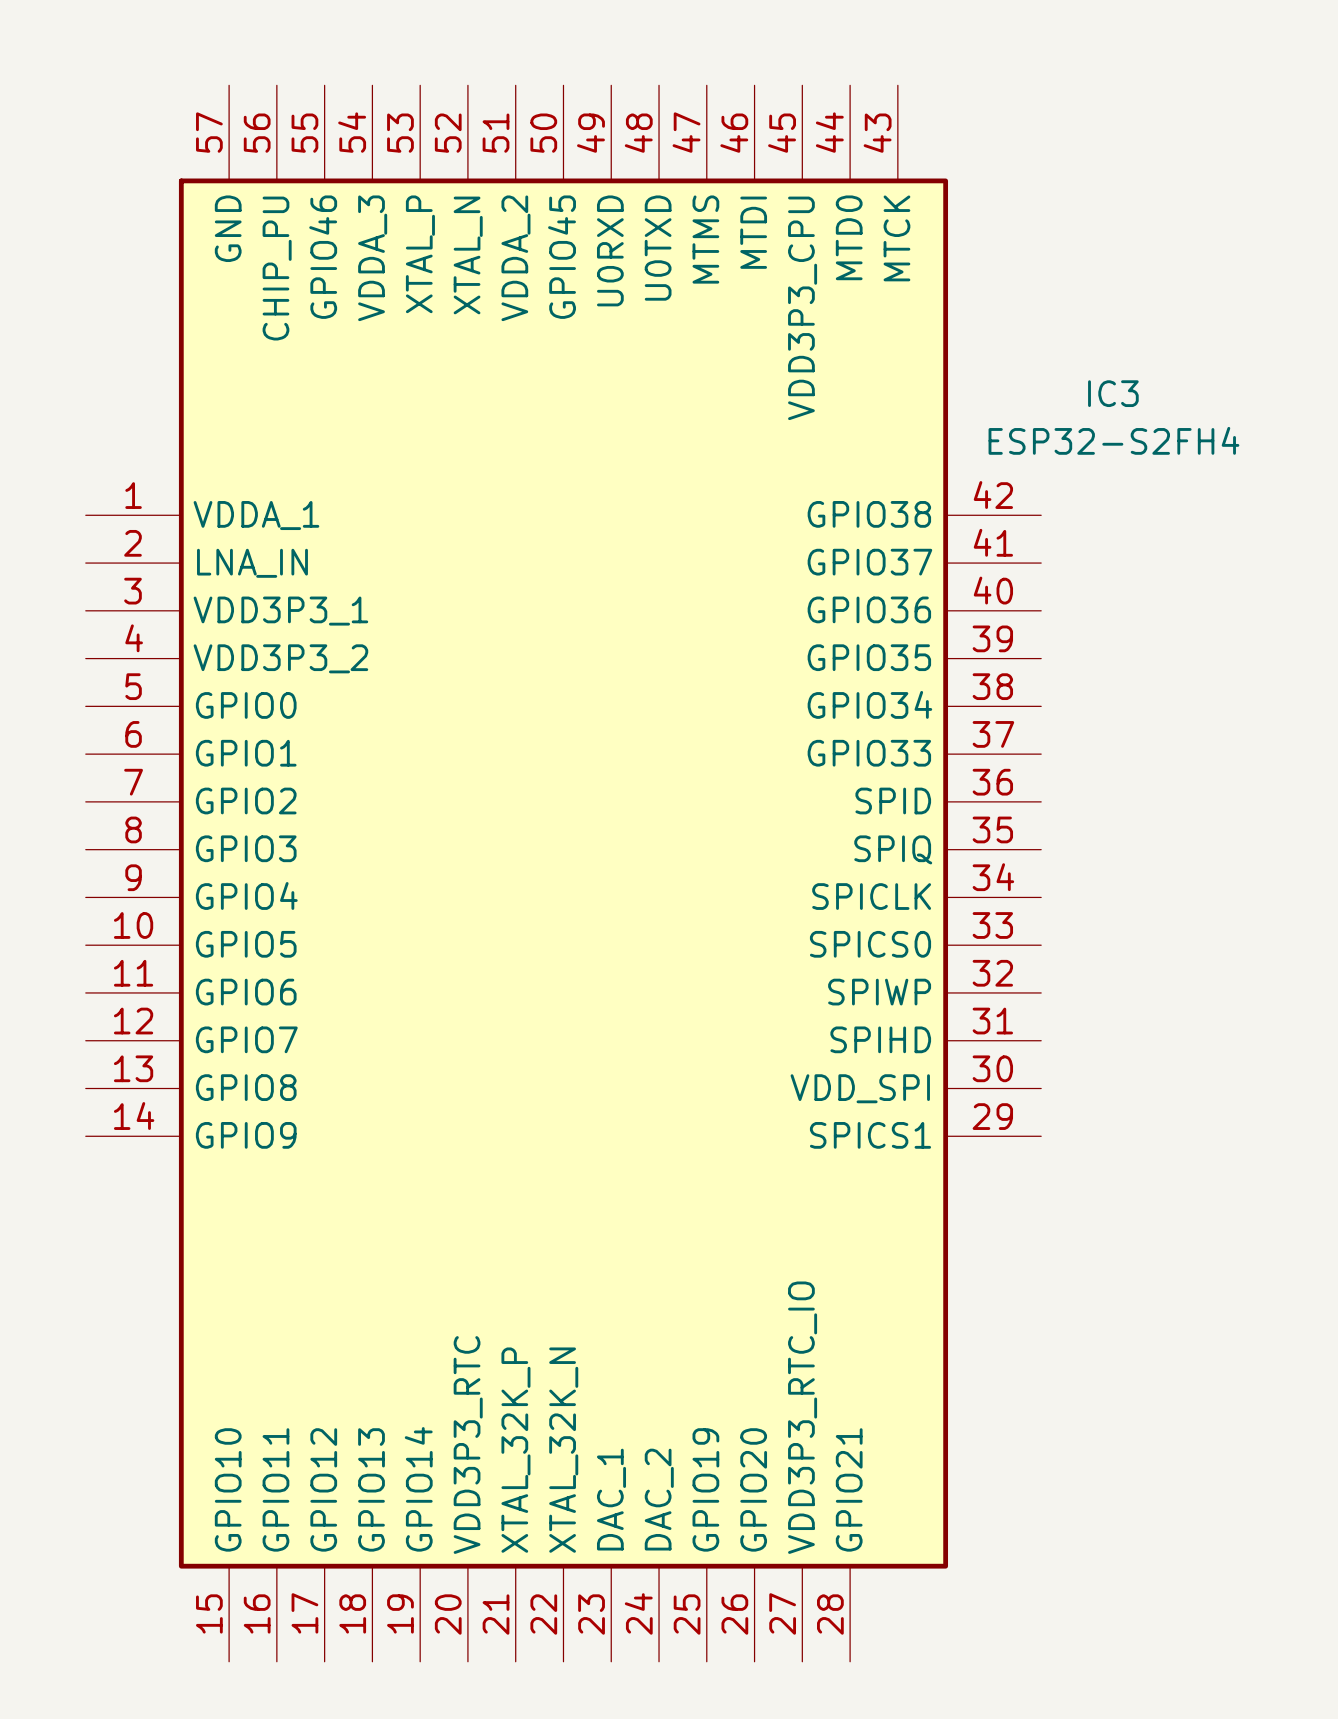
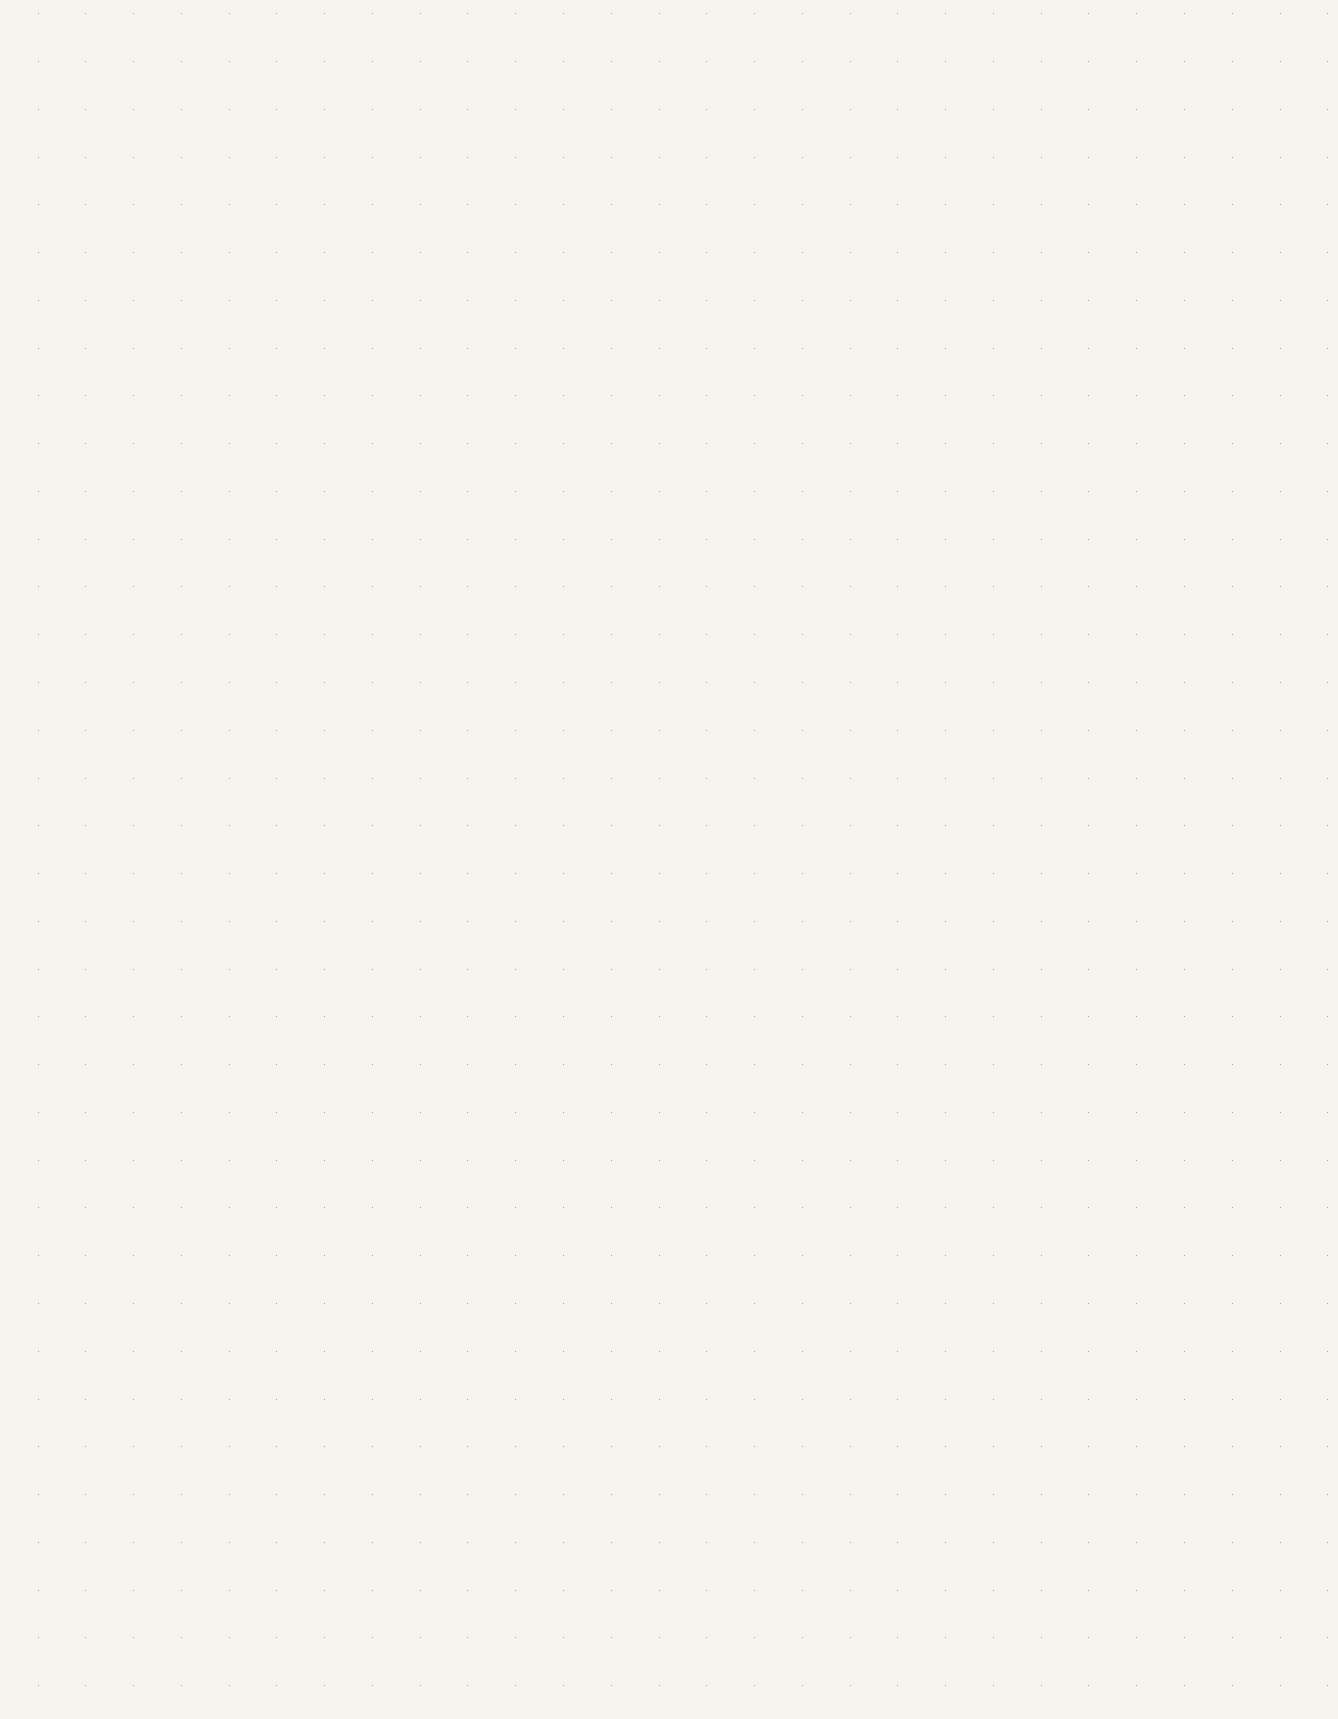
IC3: ESP32-S2FH4 (563, 873) -> none

